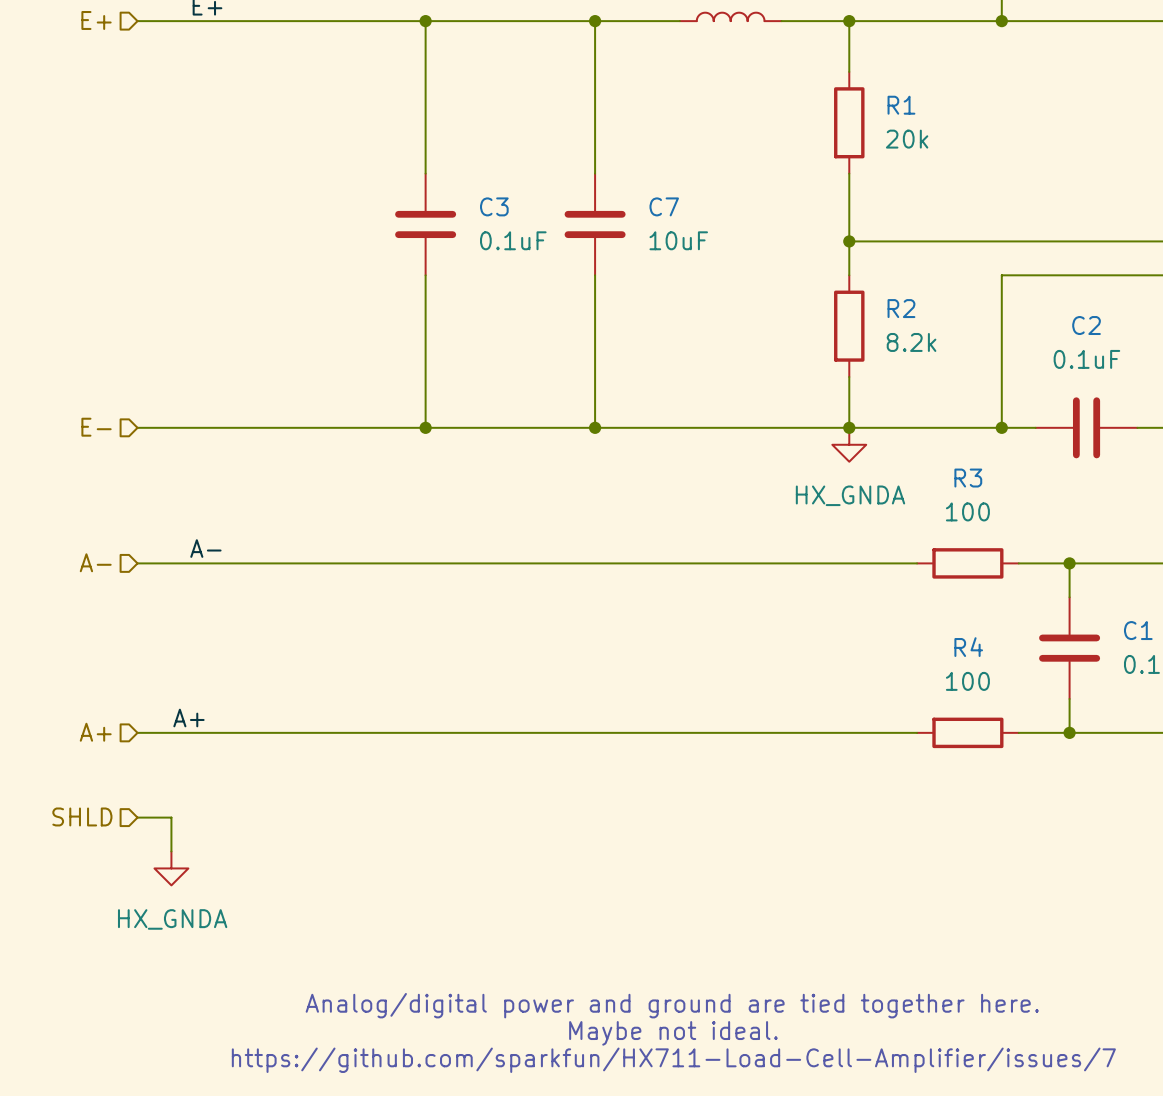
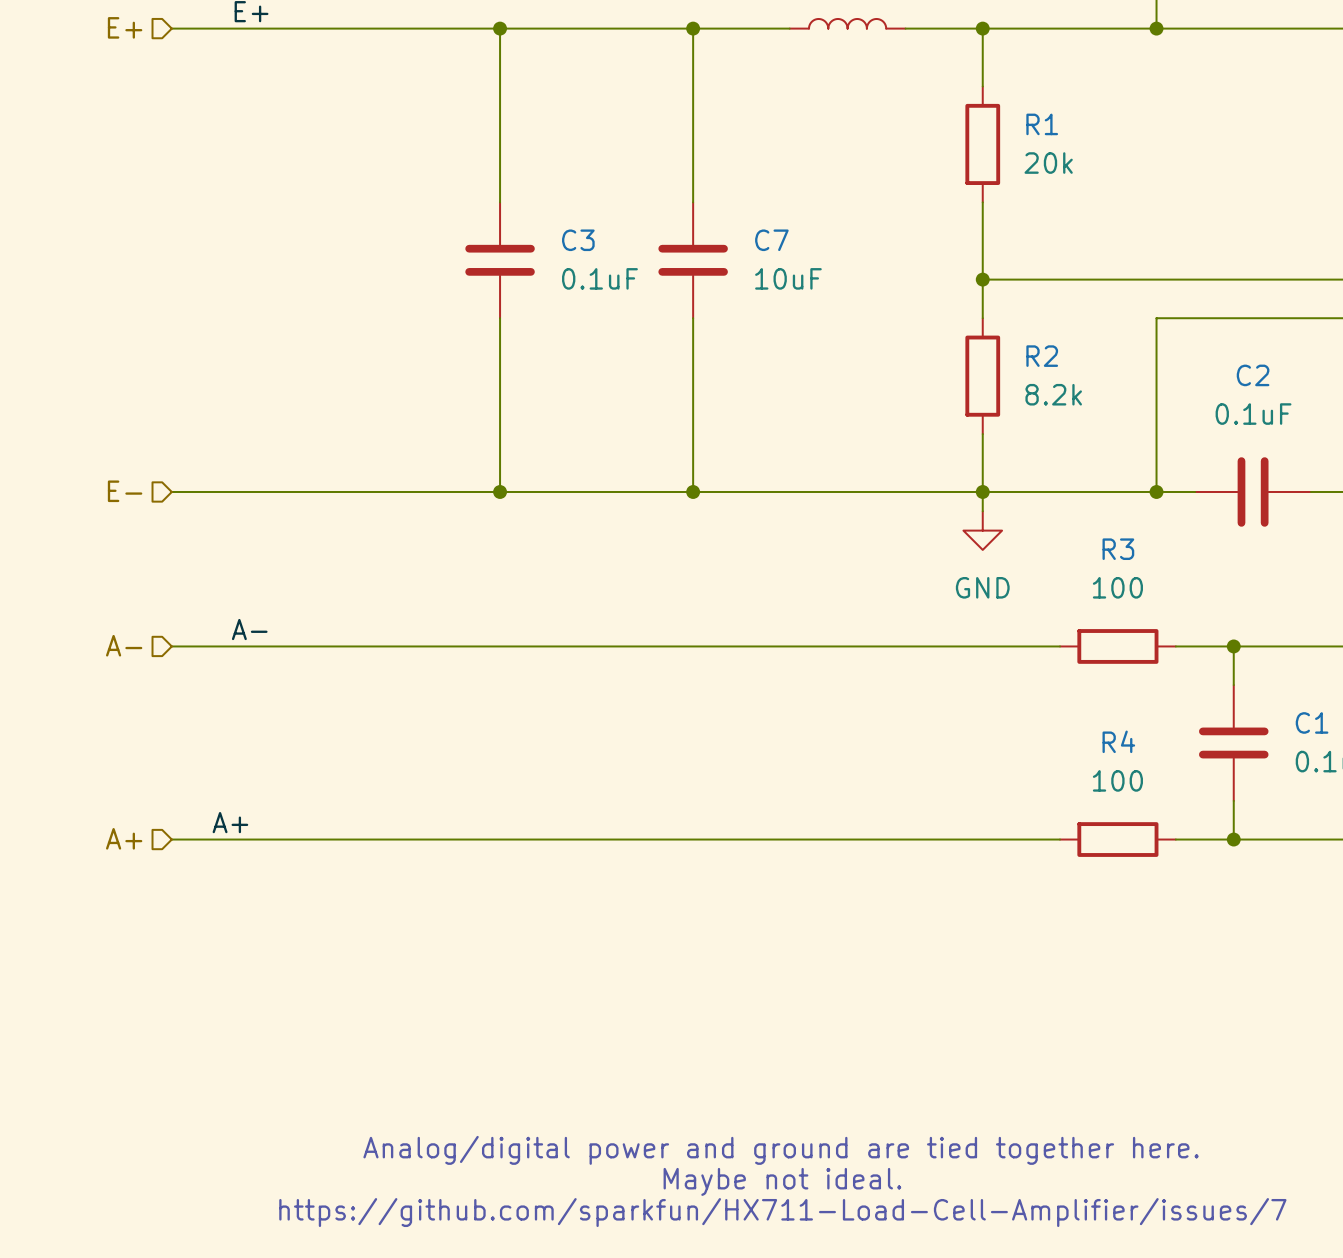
power symbol: HX_GNDA (849, 444) -> none
power symbol: none -> GND (982, 530)
hierarchical label: SHLD (82, 816) -> none
wire: (137, 817) (171, 817) (171, 851) -> none
power symbol: HX_GNDA (171, 868) -> none

